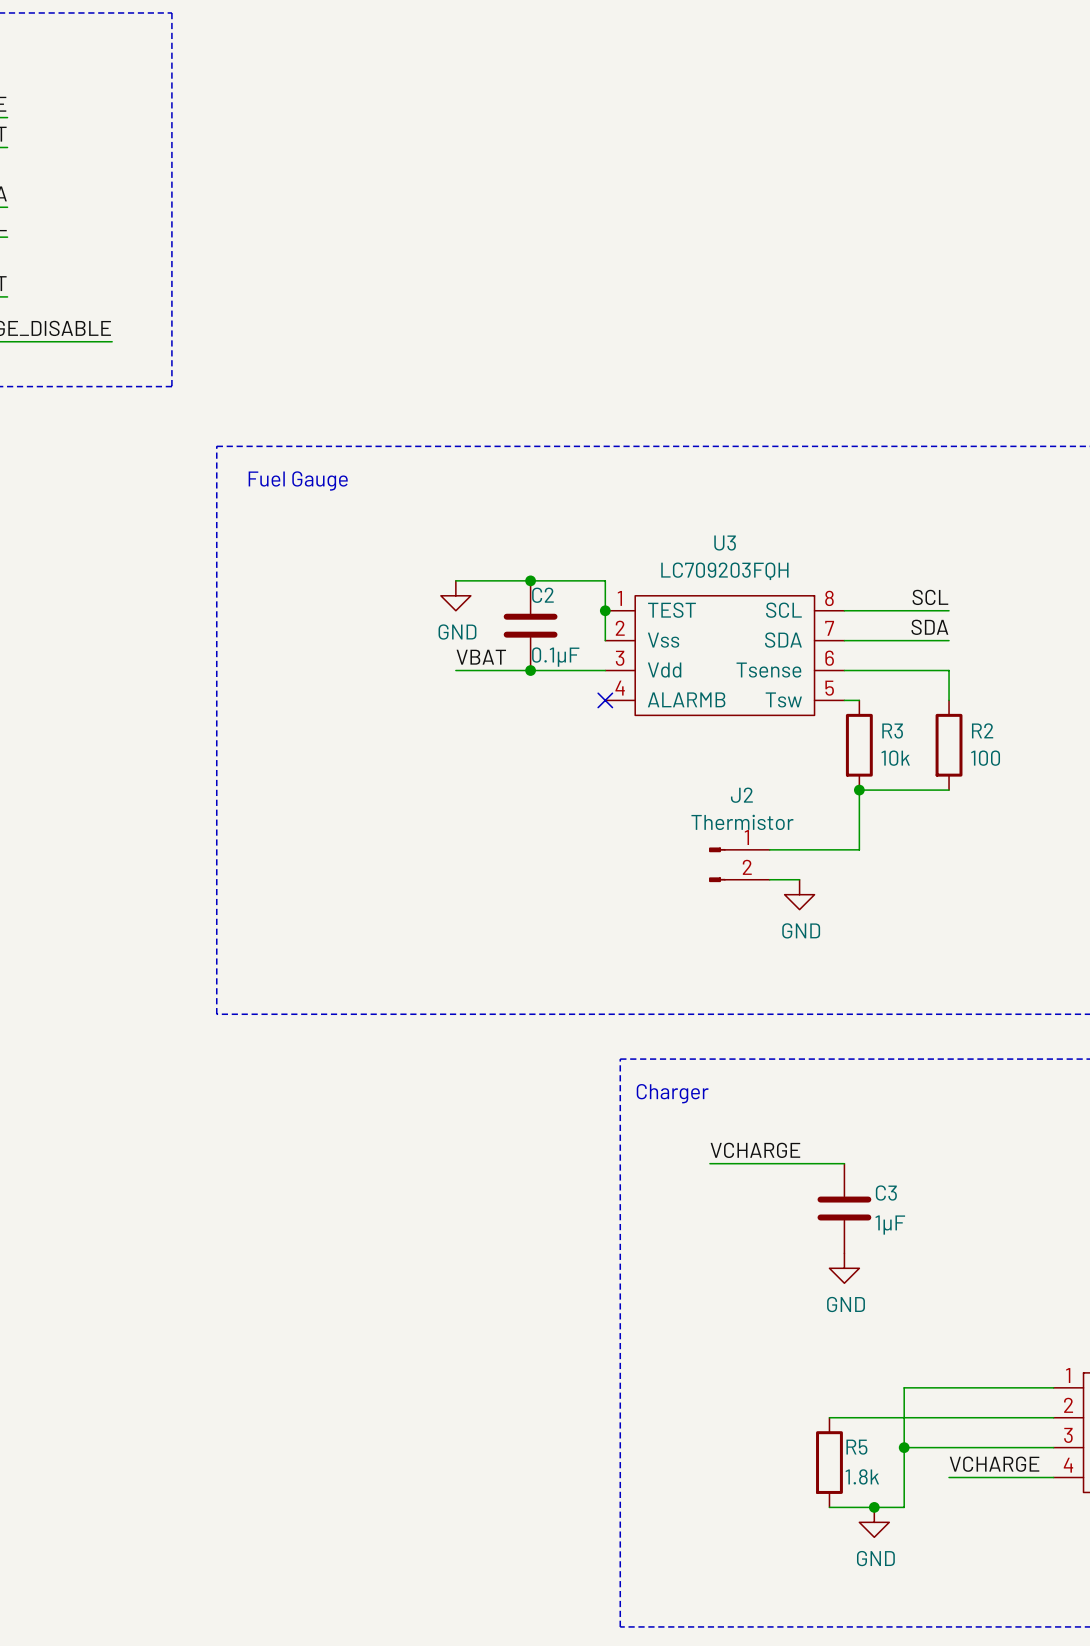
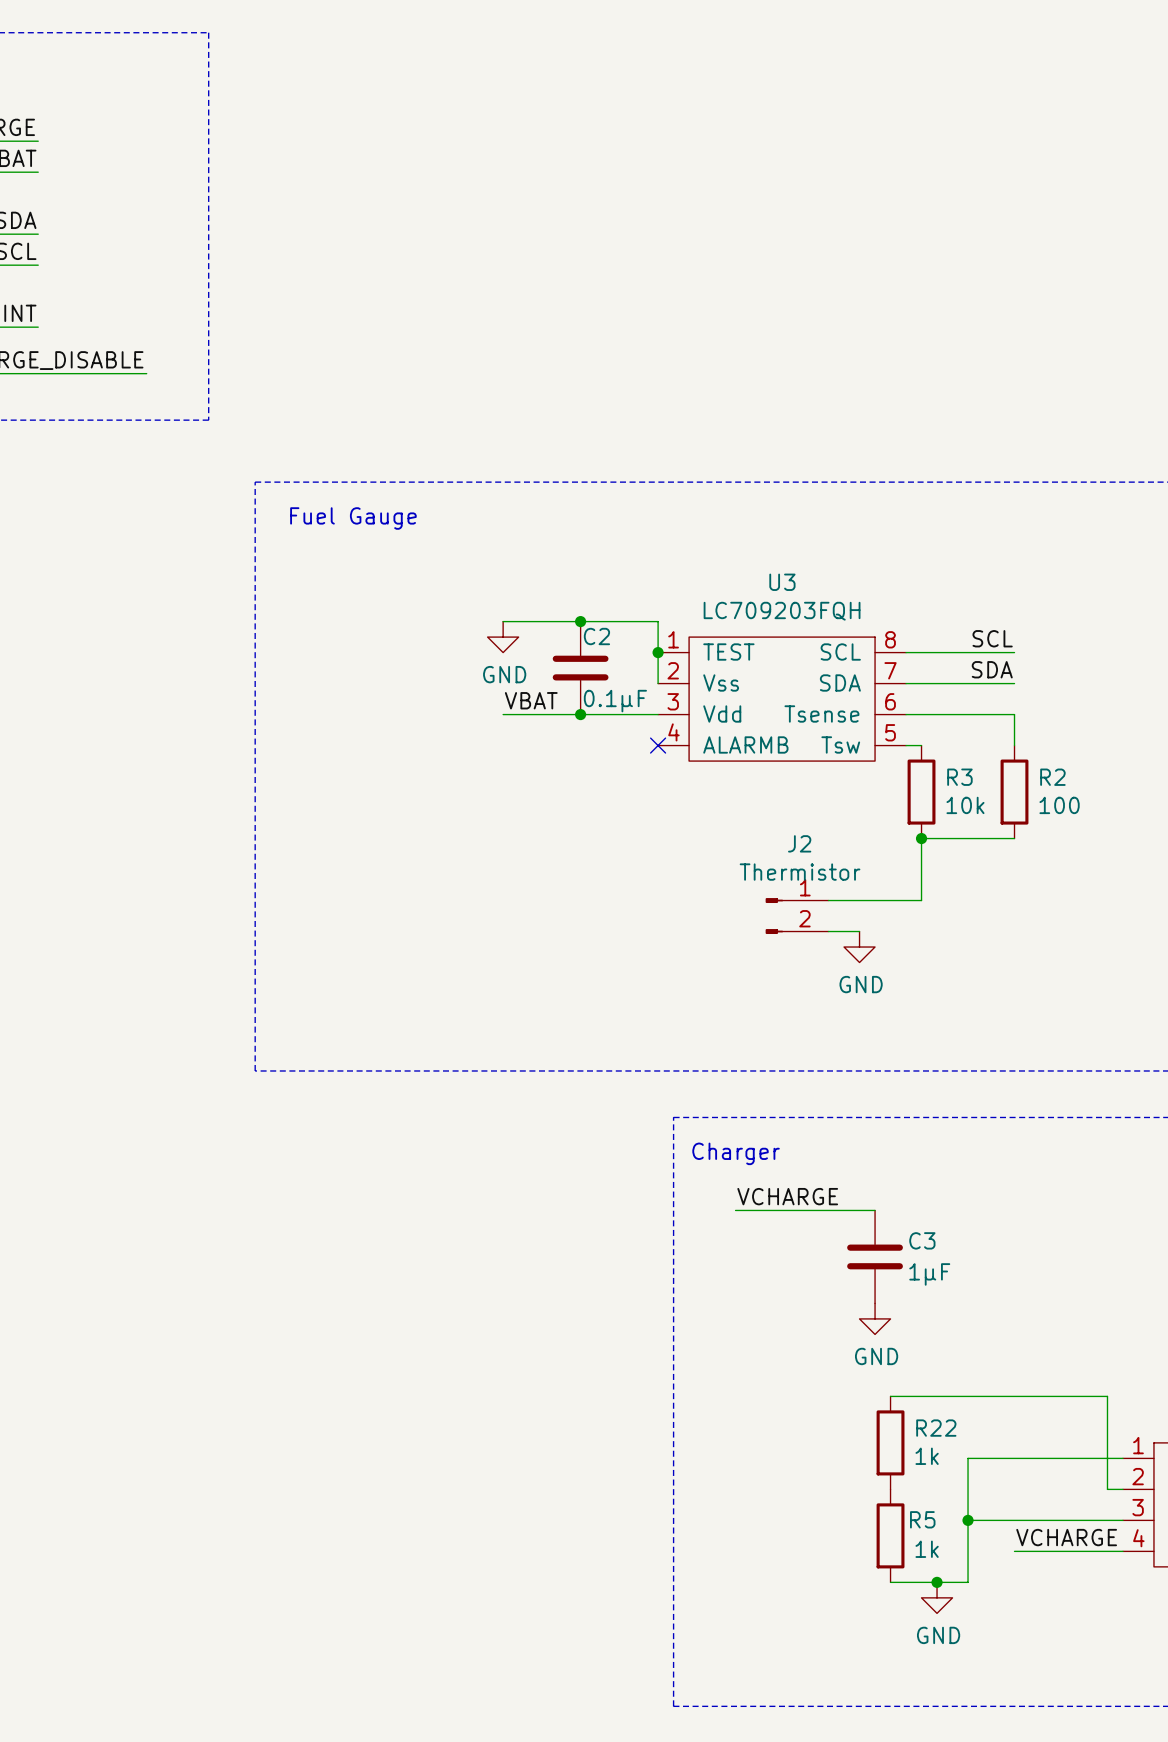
label position: VCHARGE (755, 1150) -> VCHARGE (787, 1196)
wire: (709, 1163) (844, 1163) -> (735, 1210) (875, 1210)
C3 position: (844, 1208) -> (875, 1256)
power symbol position: GND (844, 1268) -> GND (875, 1318)
R22: none -> 1k (890, 1442)
wire: (829, 1417) (1038, 1417) -> (890, 1396) (1107, 1396) (1107, 1489)
R5 value: 1.8k (862, 1476) -> 1k (927, 1549)

